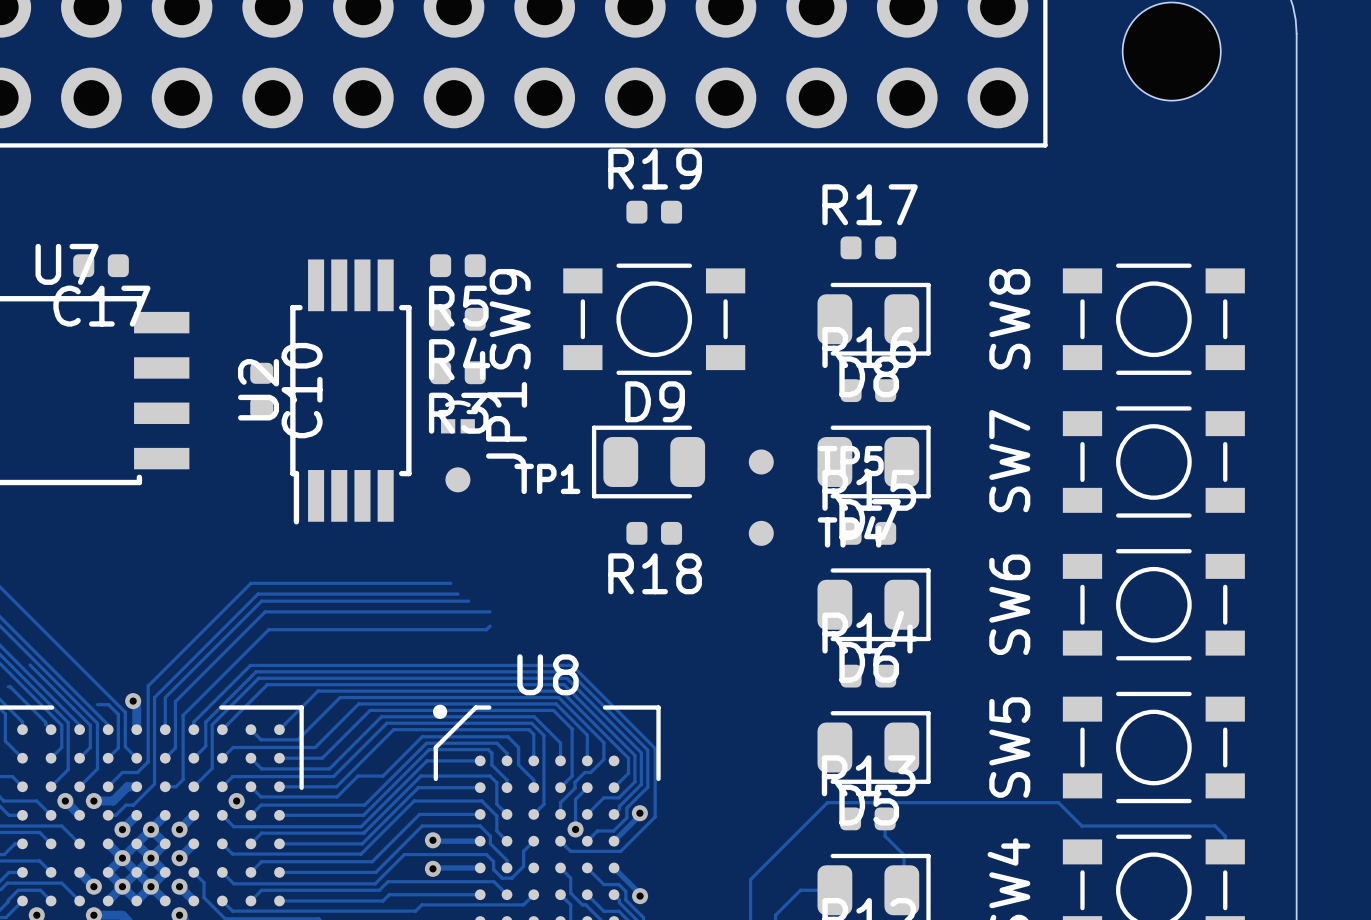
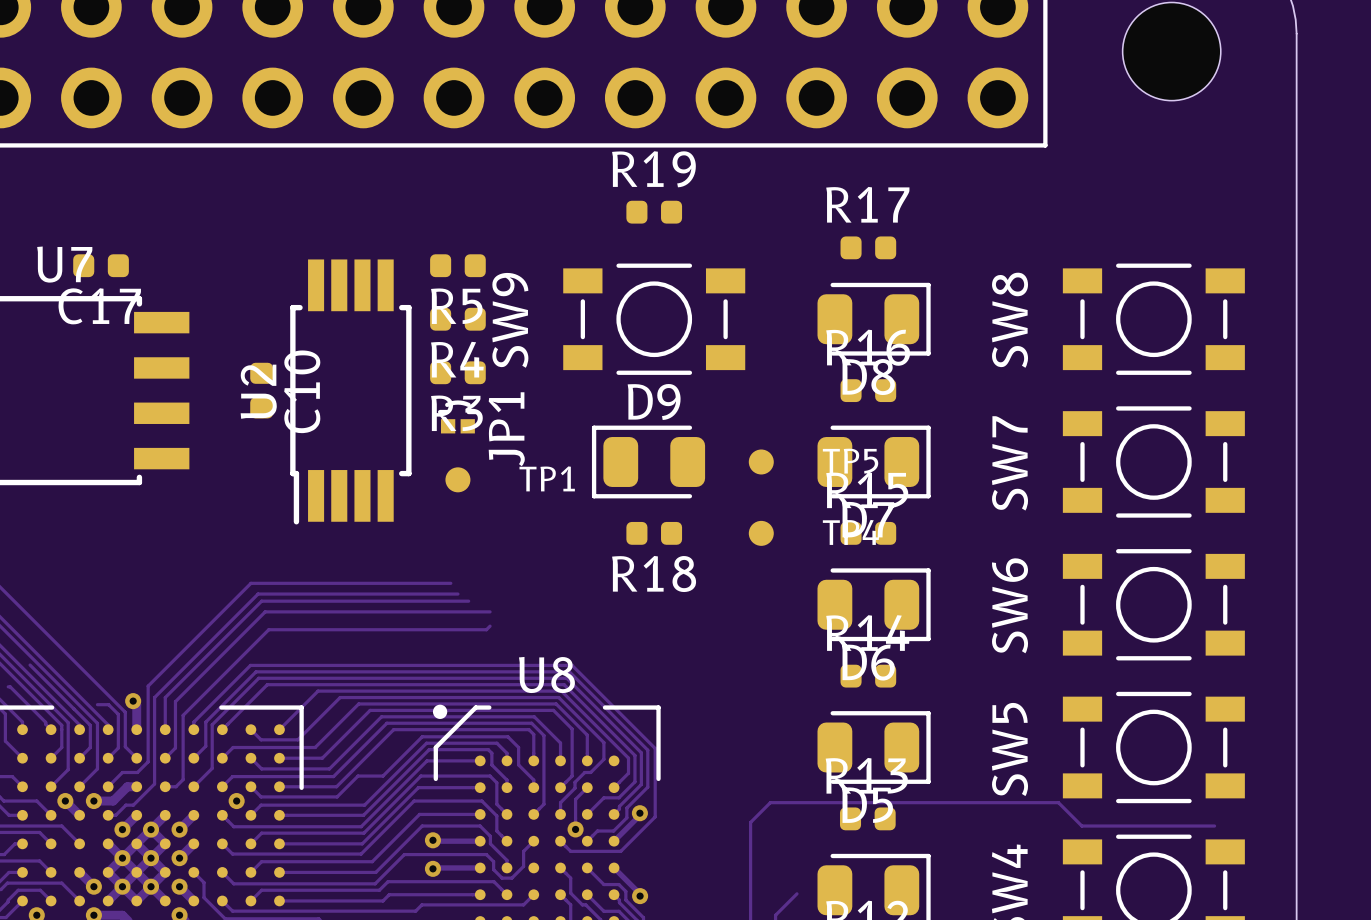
track: (827, 802) (750, 879) -> (827, 802) (770, 802) (750, 822) (750, 879)
track: (885, 818) (885, 836) (904, 855) (904, 888) (901, 890) -> none
track: (1215, 826) (1225, 836) (1225, 851) -> none
track: (834, 890) (800, 890) (796, 893) -> none

